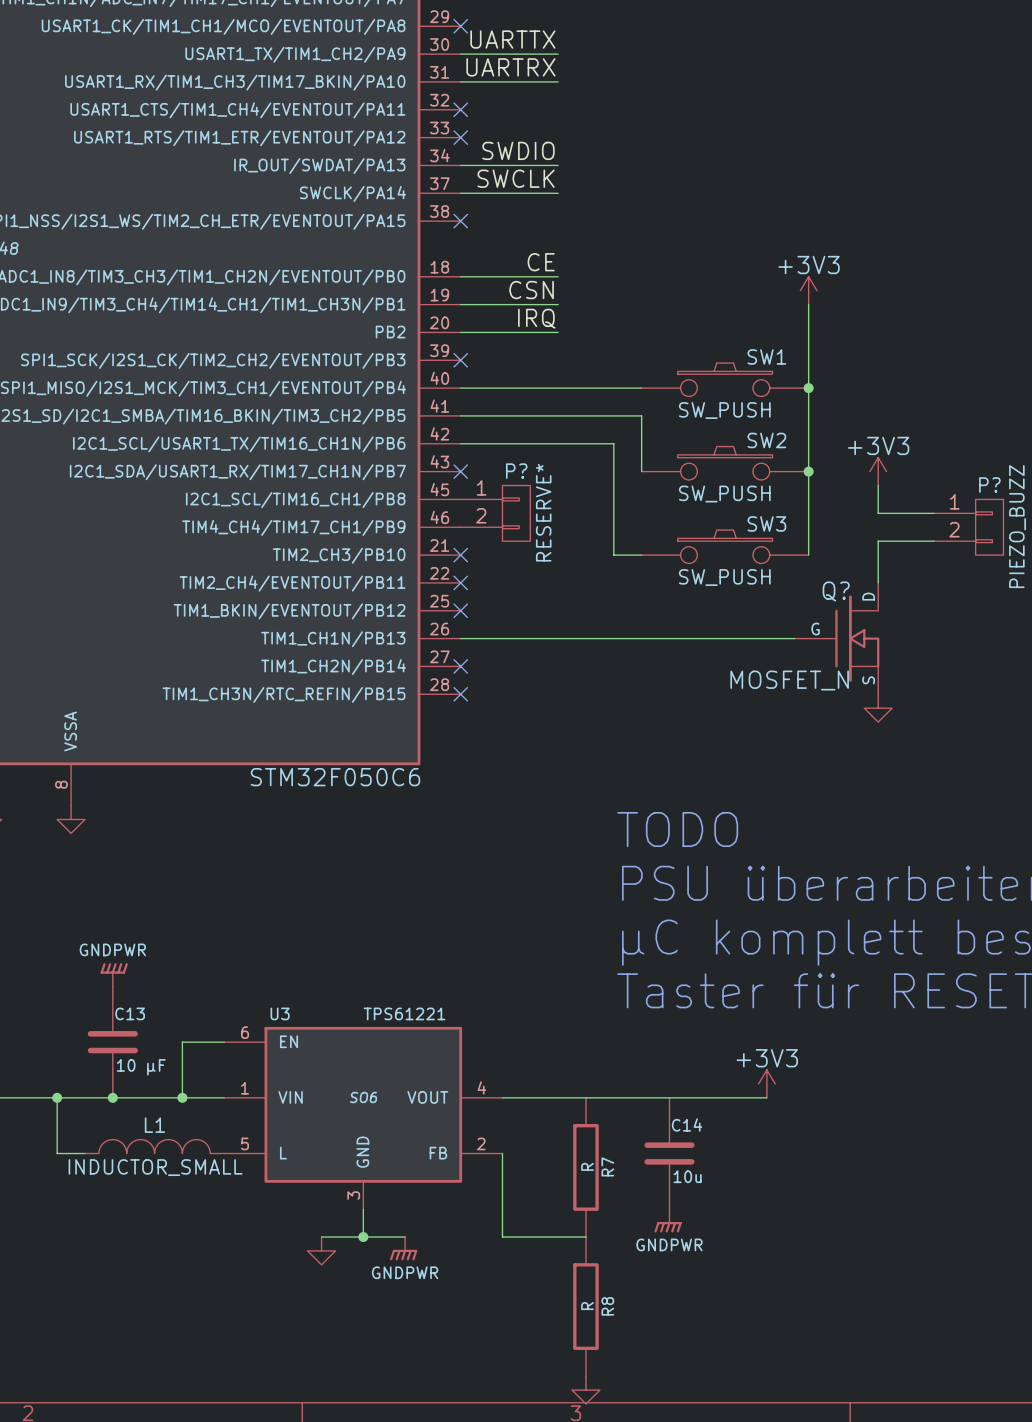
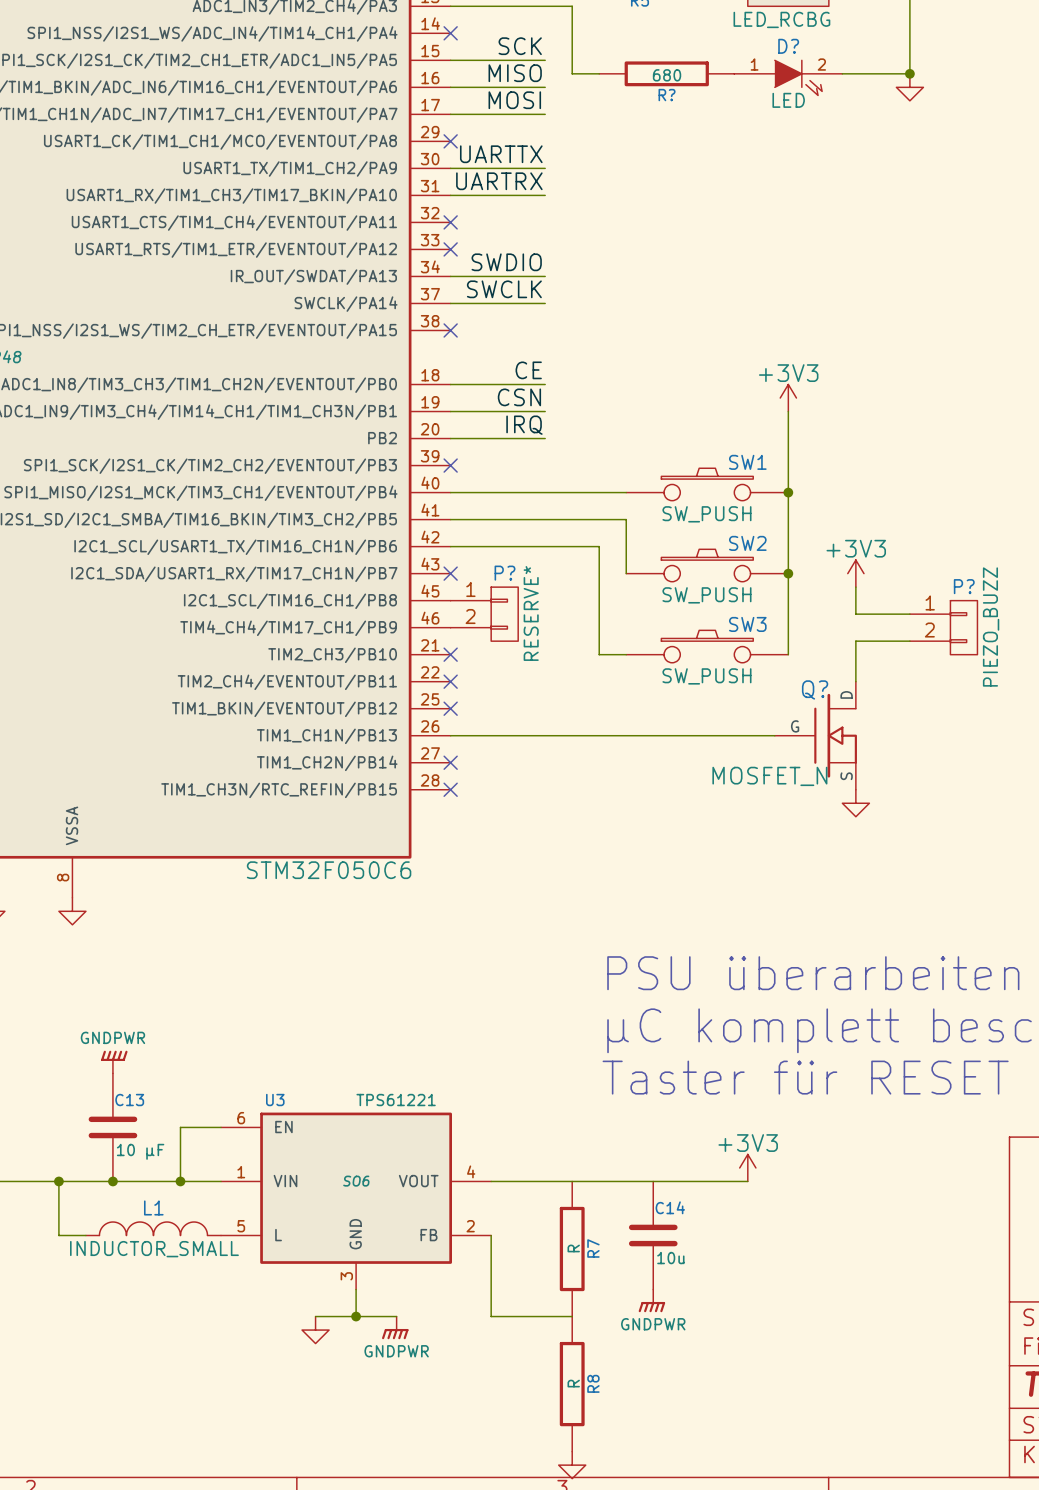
text: TODO (677, 829) -> none

